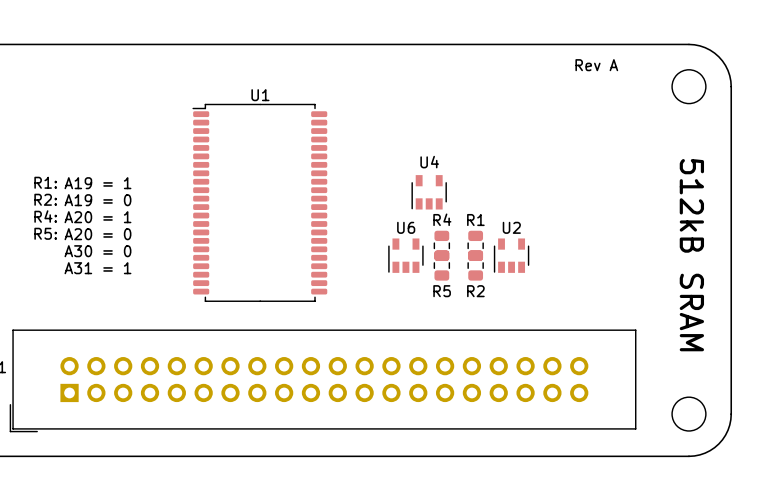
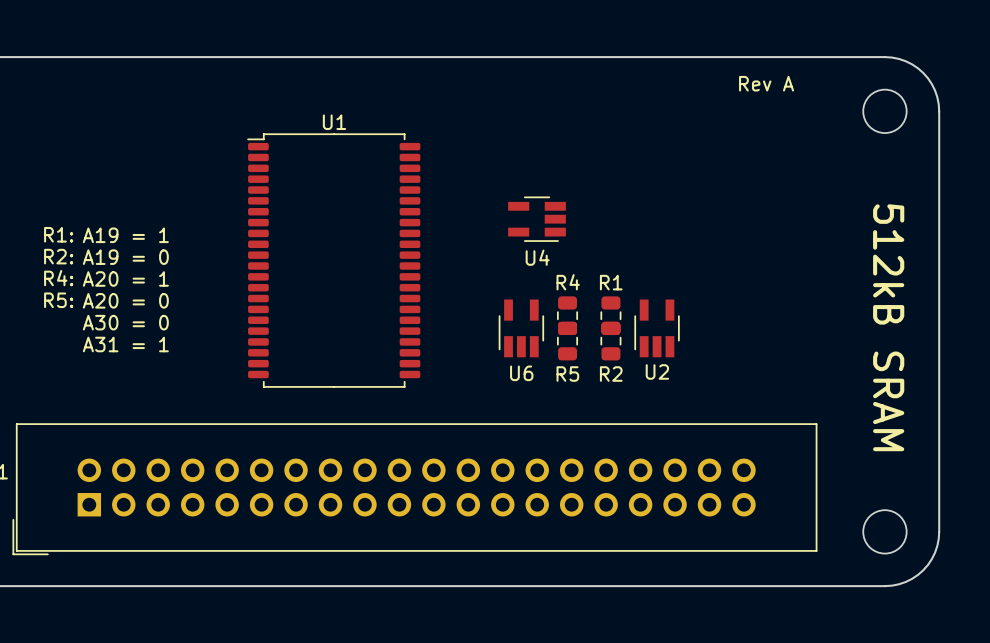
U4 name position: U4 (429, 162) -> U4 (537, 257)
U4 footprint: [411, 175, 447, 210] -> [508, 196, 566, 242]
U6 name position: U6 (406, 227) -> U6 (521, 373)
U2 name position: U2 (511, 227) -> U2 (657, 371)
U6 footprint: [388, 238, 424, 273] -> [498, 299, 545, 358]
U2 footprint: [493, 238, 530, 273] -> [634, 299, 680, 358]

